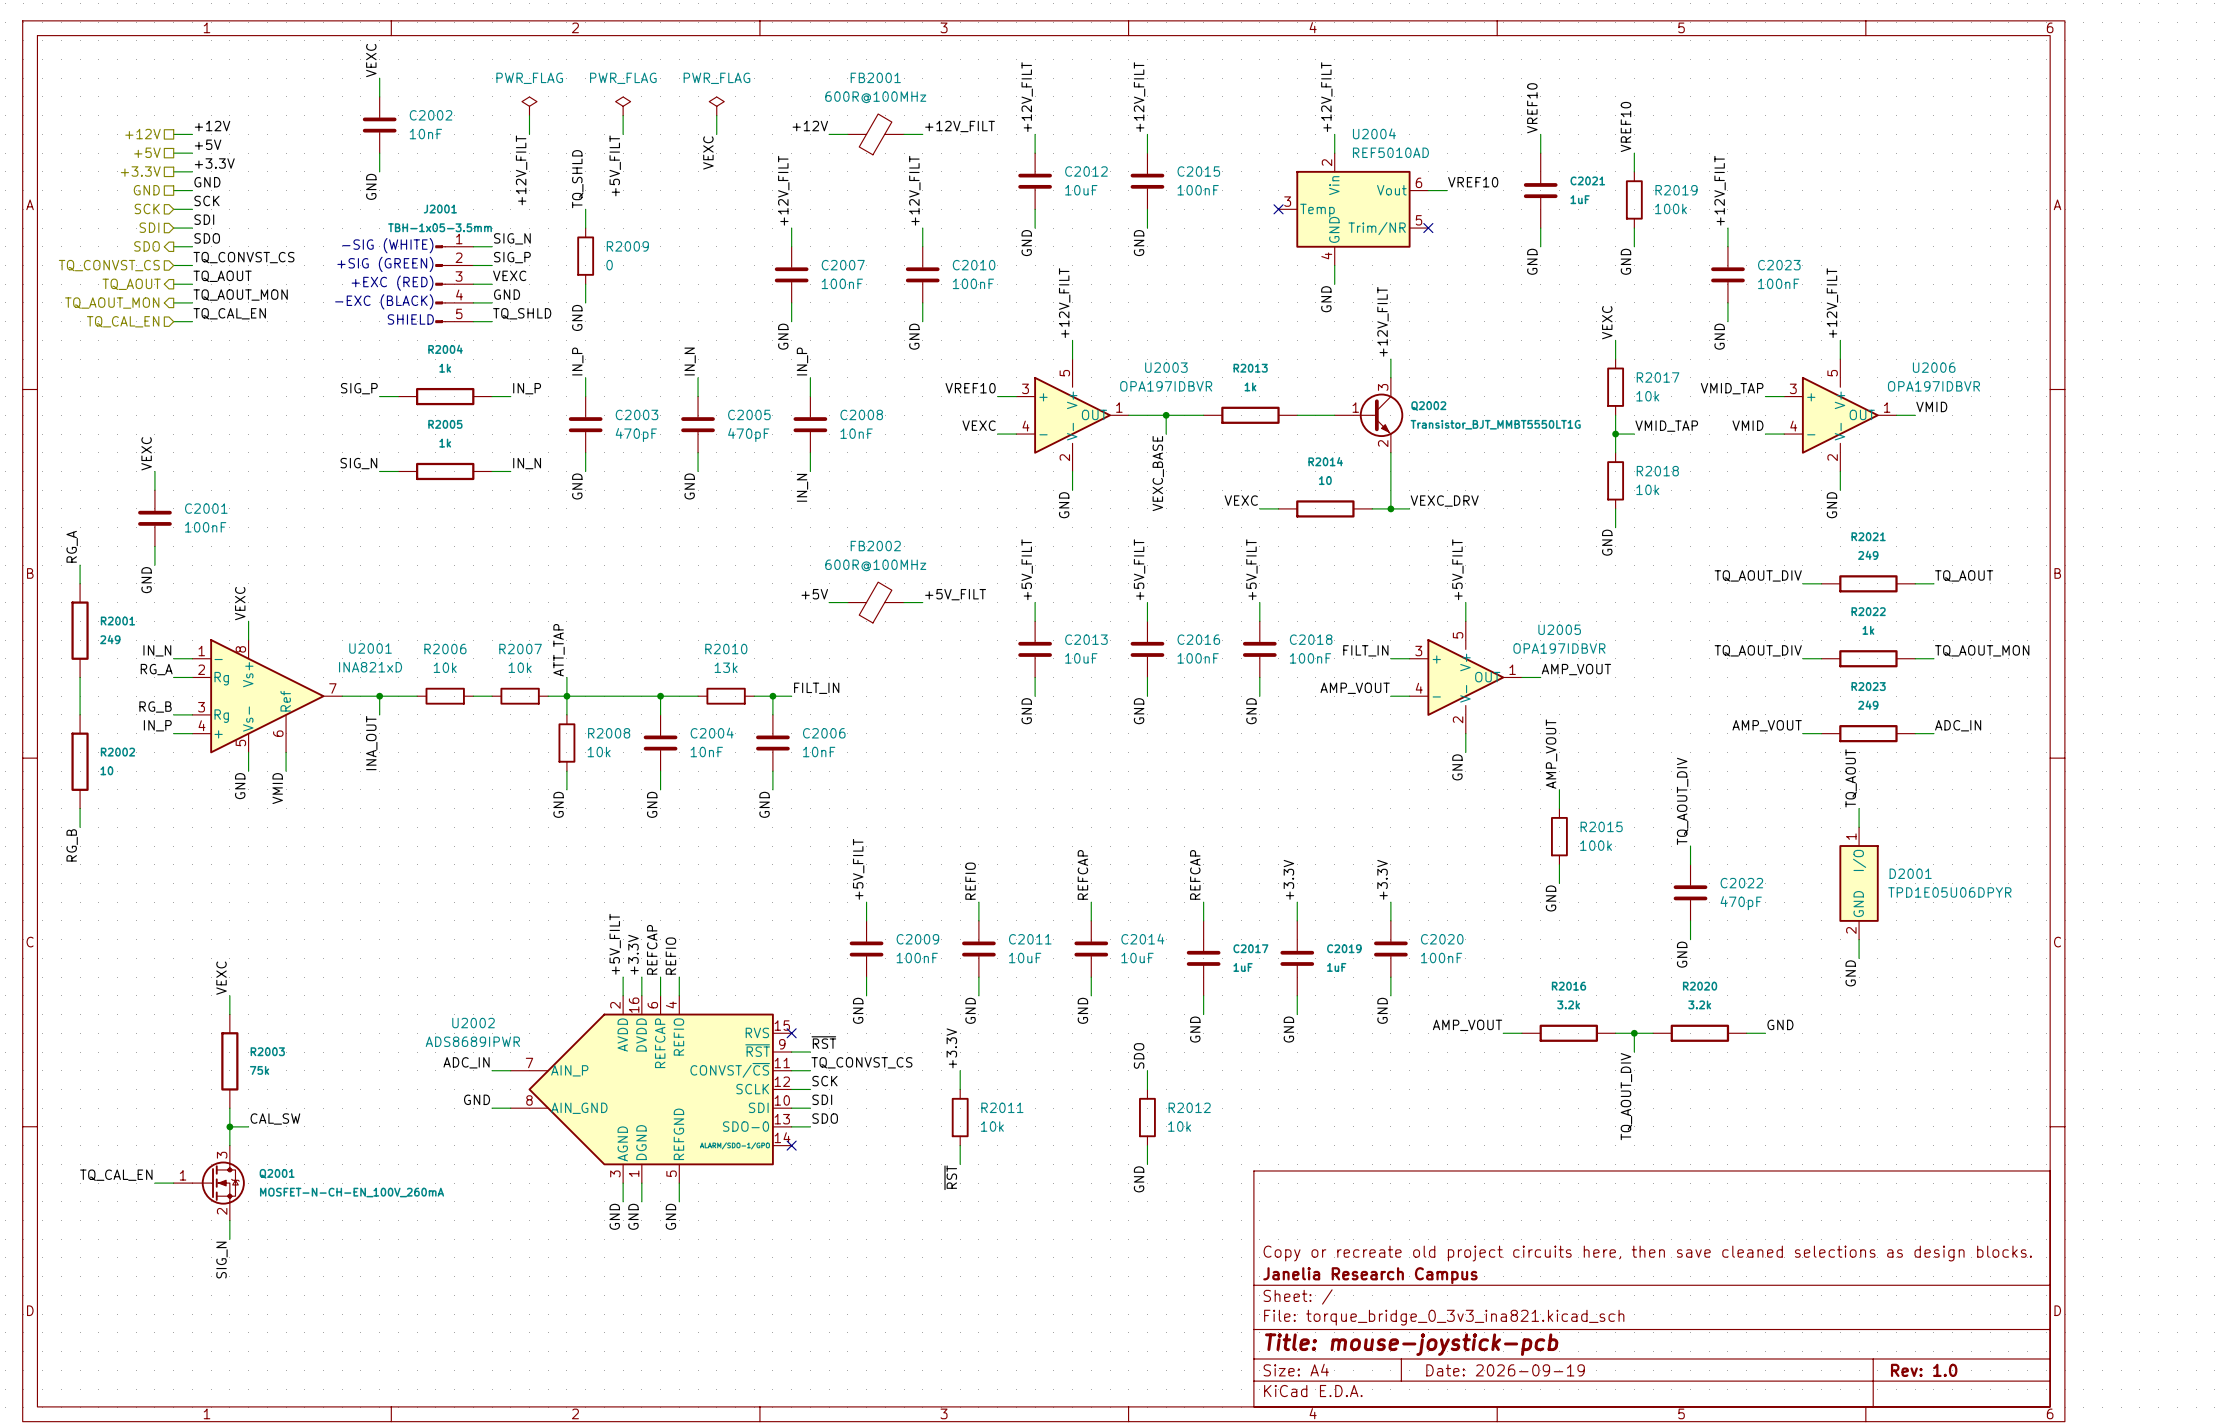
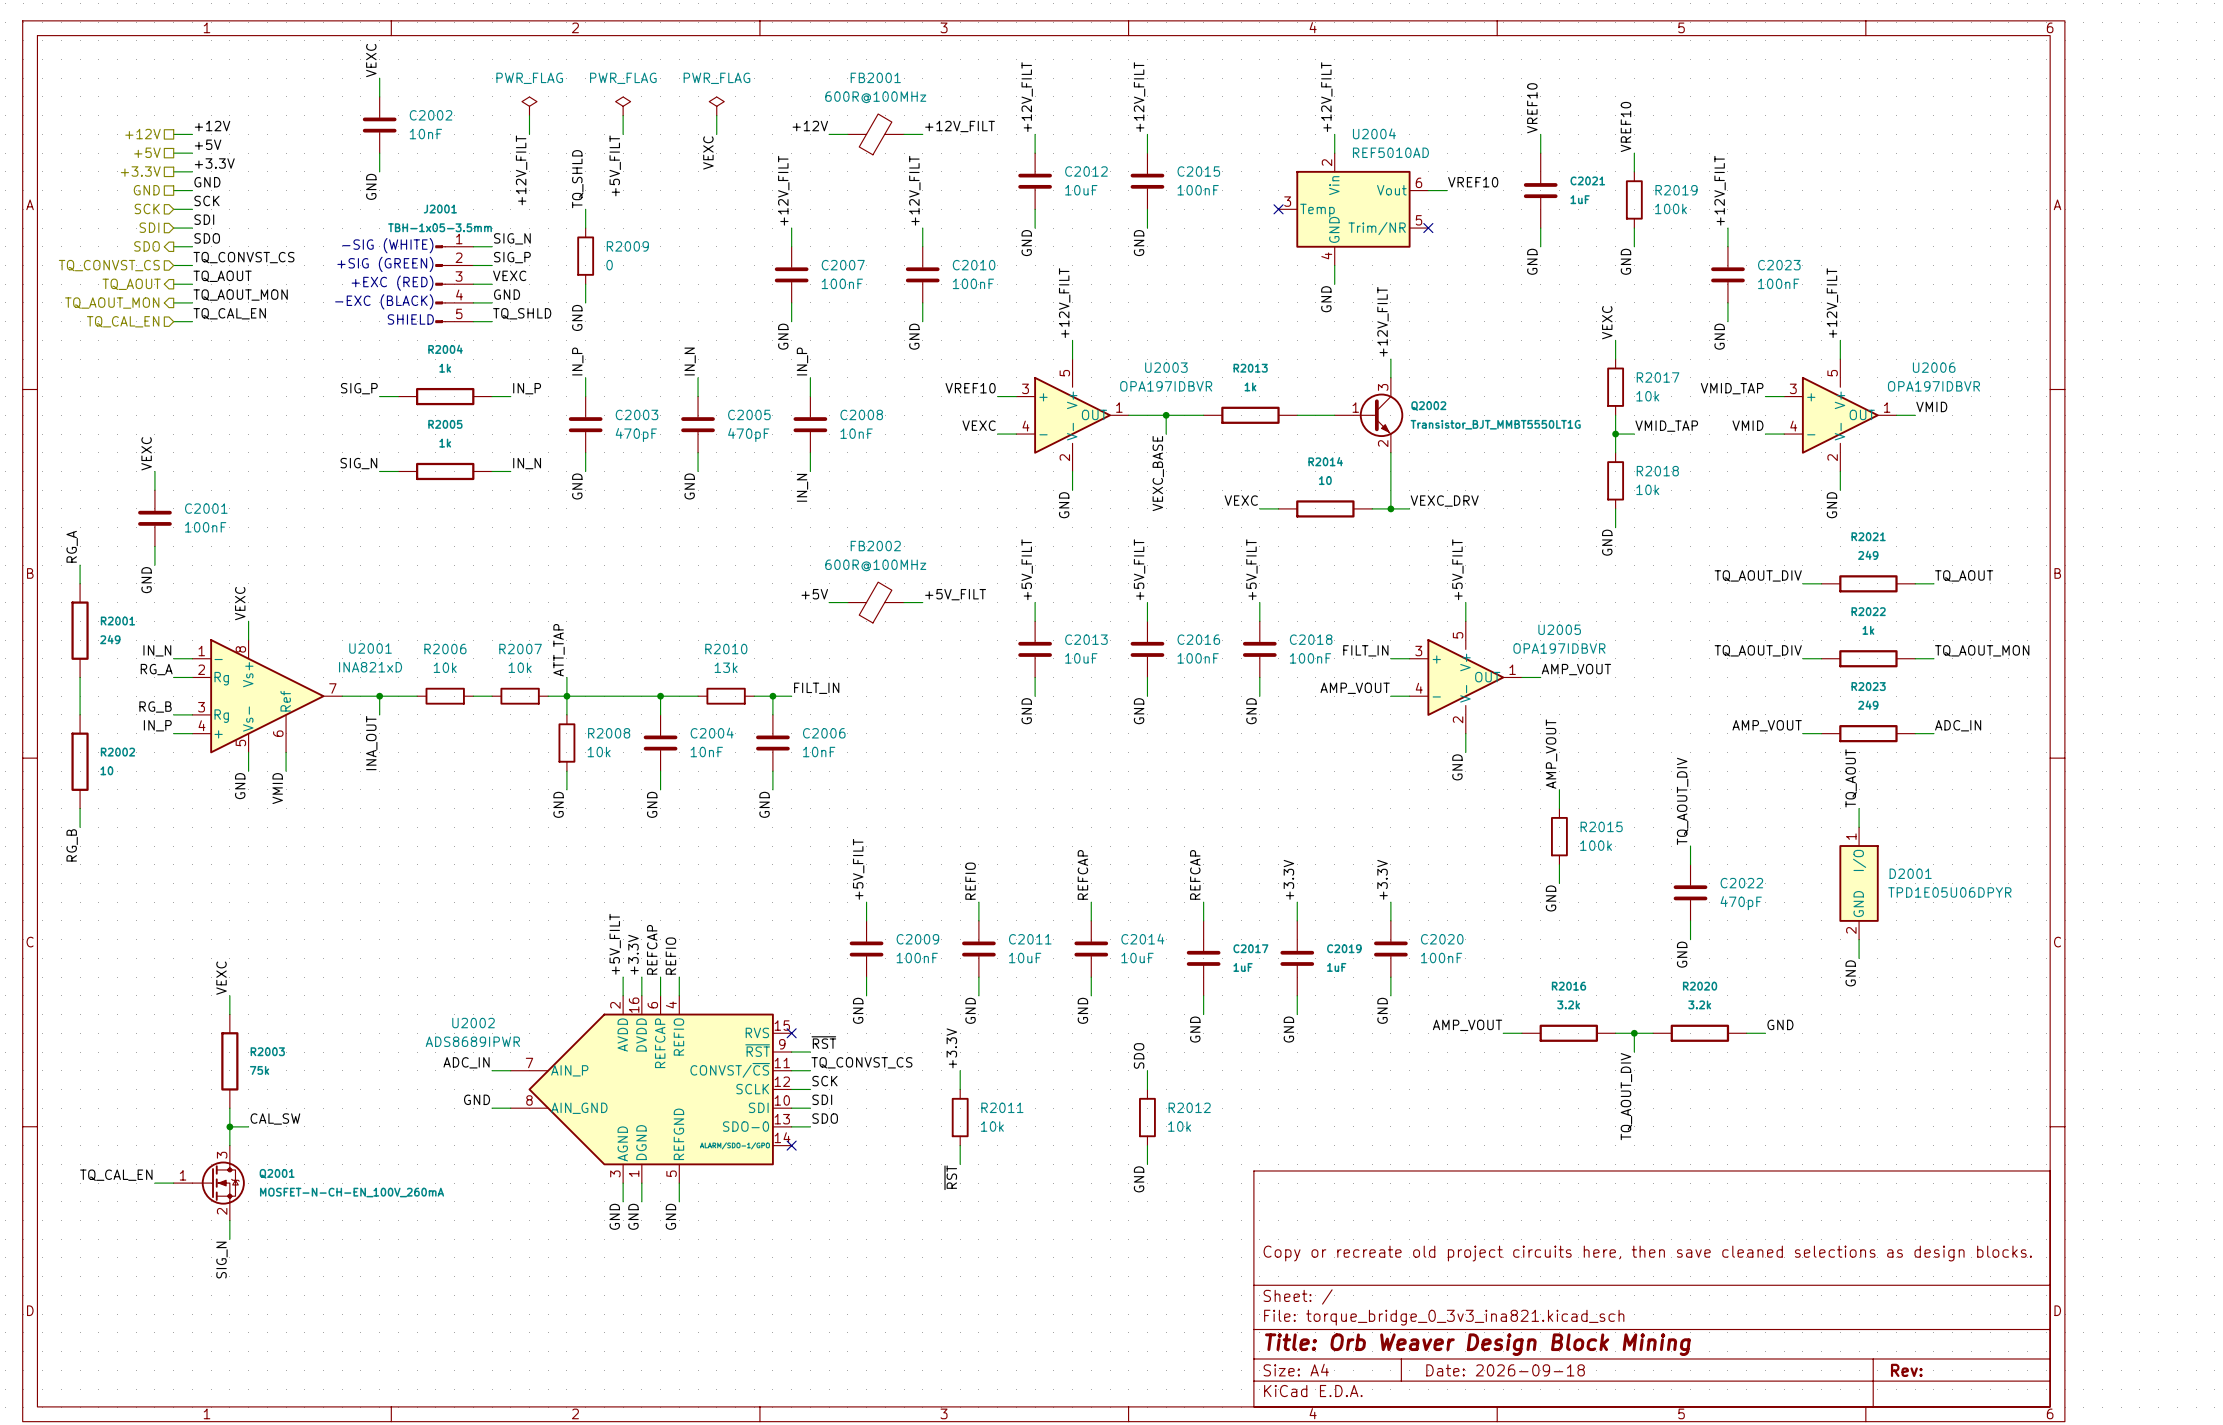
title block: Janelia Research Campus (1370, 1275) -> none
title block: Title: mouse-joystick-pcb (1411, 1344) -> Title: Orb Weaver Design Block Mining (1477, 1344)
title block: Date: 2026-09-19 (1505, 1370) -> Date: 2026-09-18 (1505, 1370)
title block: Rev: 1.0 (1924, 1370) -> Rev: (1906, 1370)

